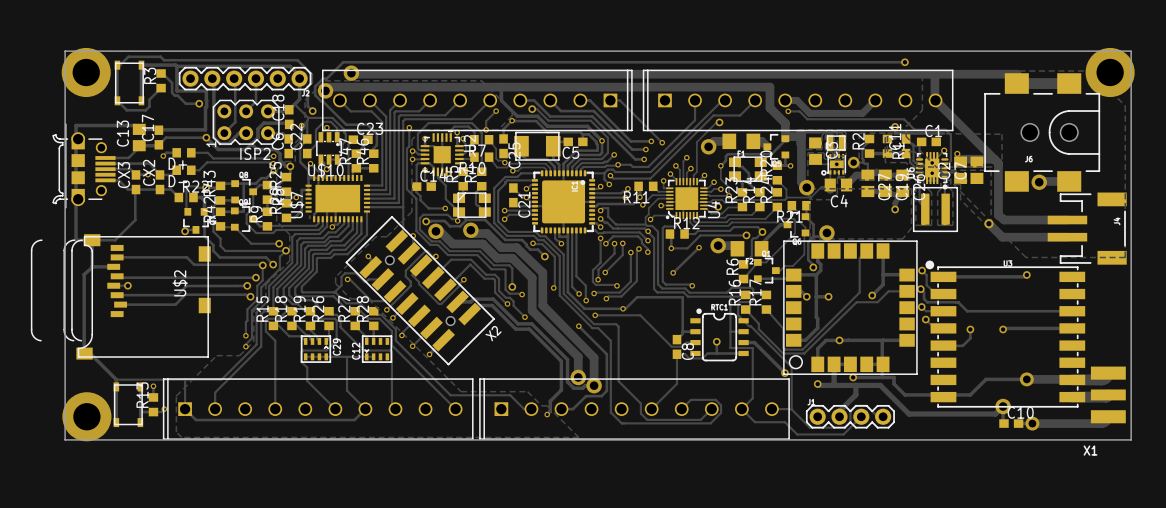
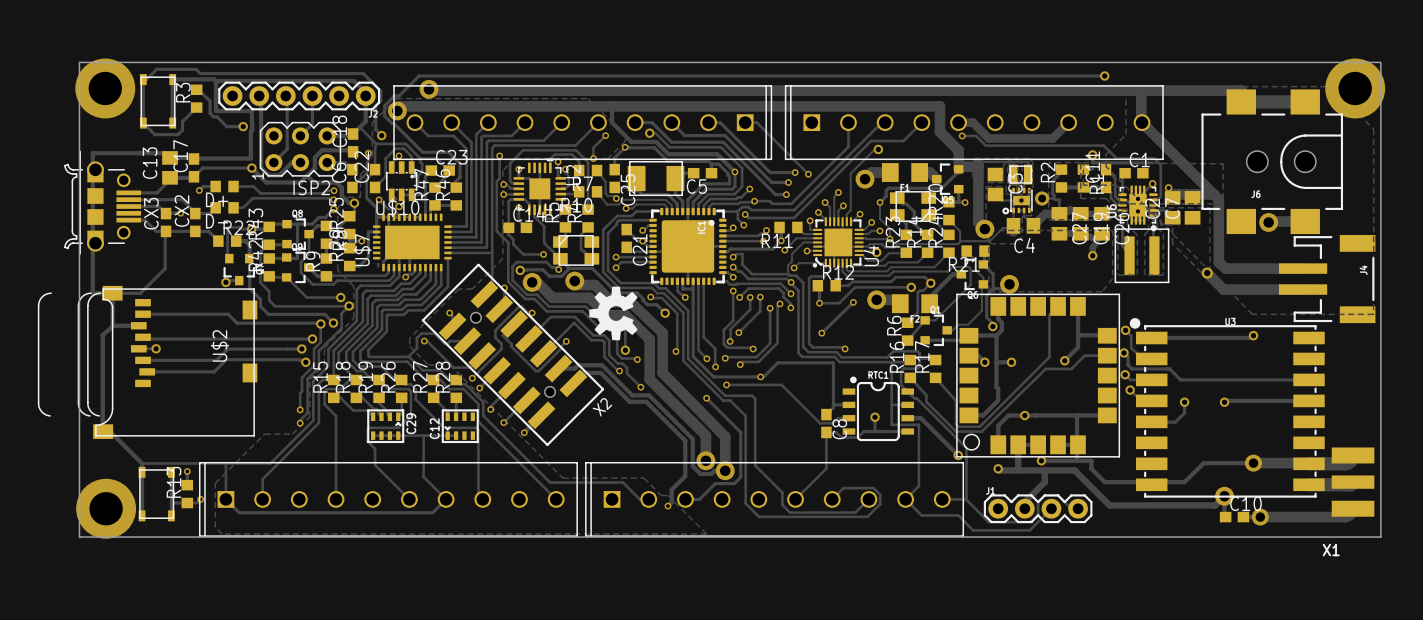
drawing: none -> [589, 286, 638, 341]

